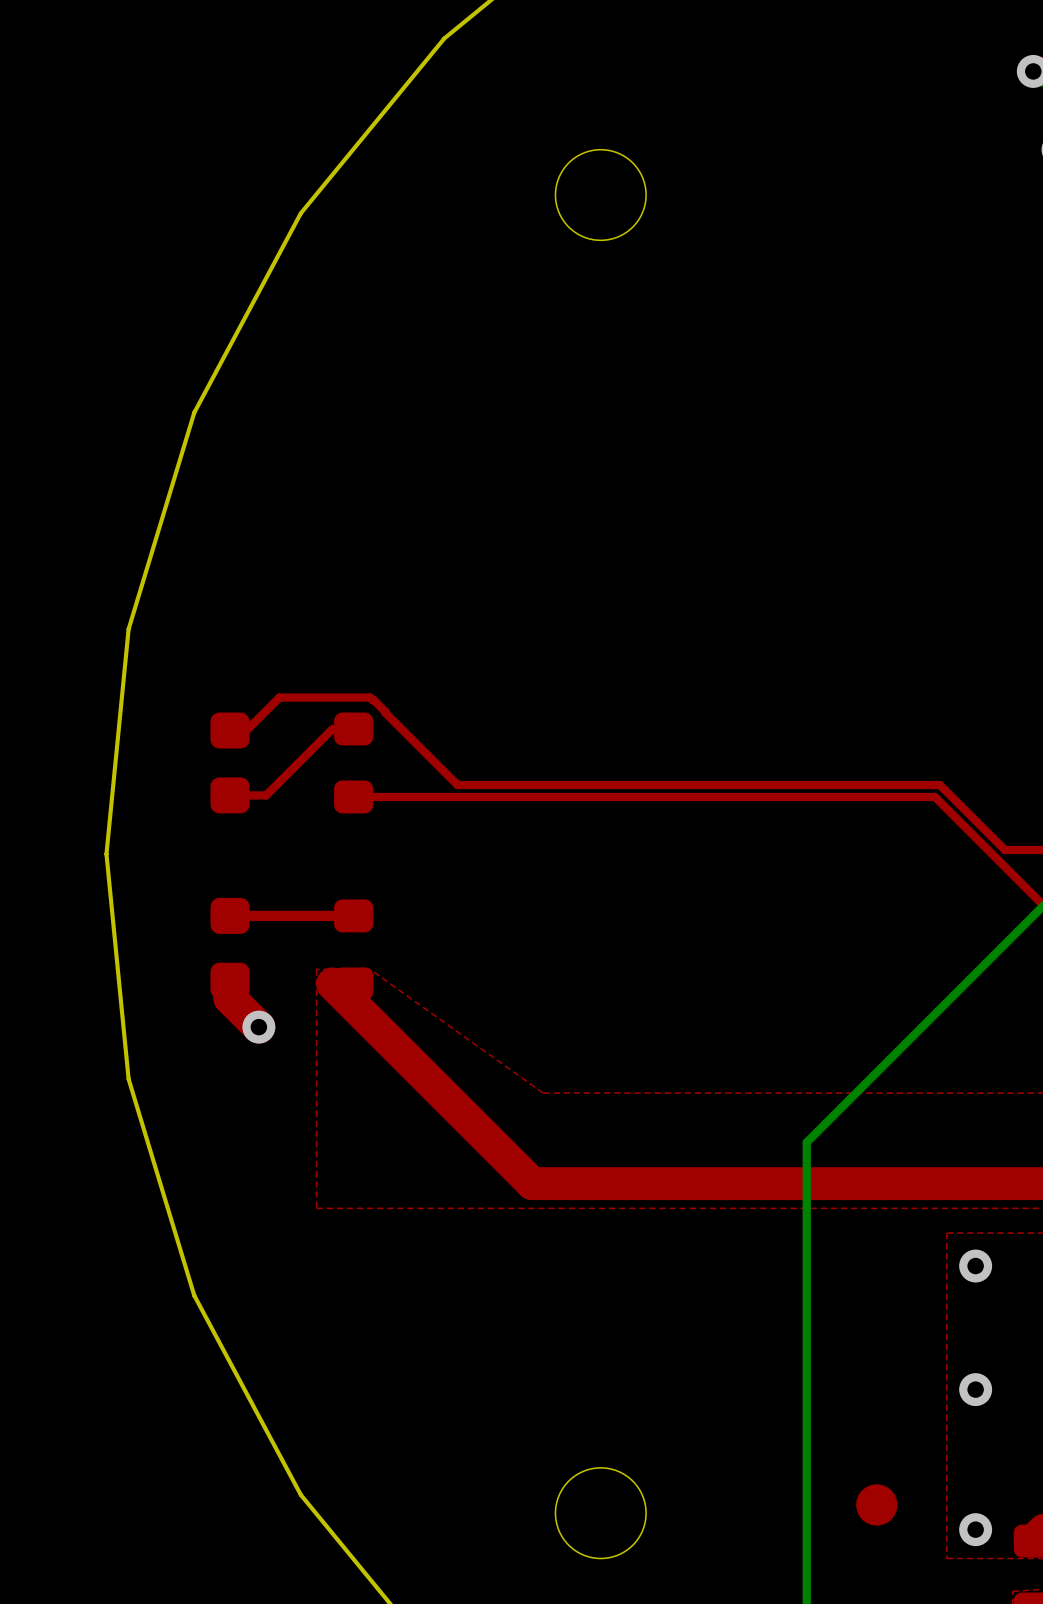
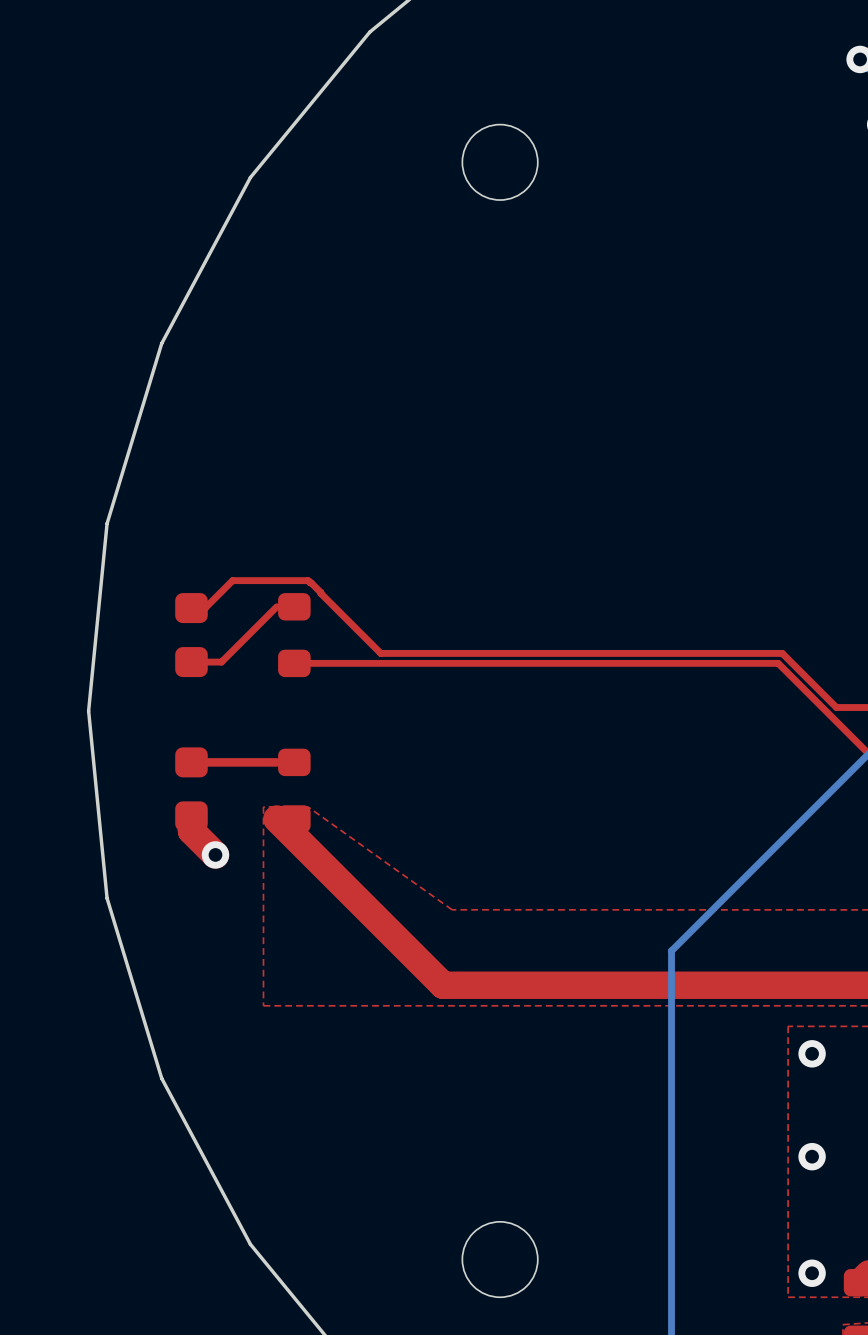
part: (876, 1504) -> none

